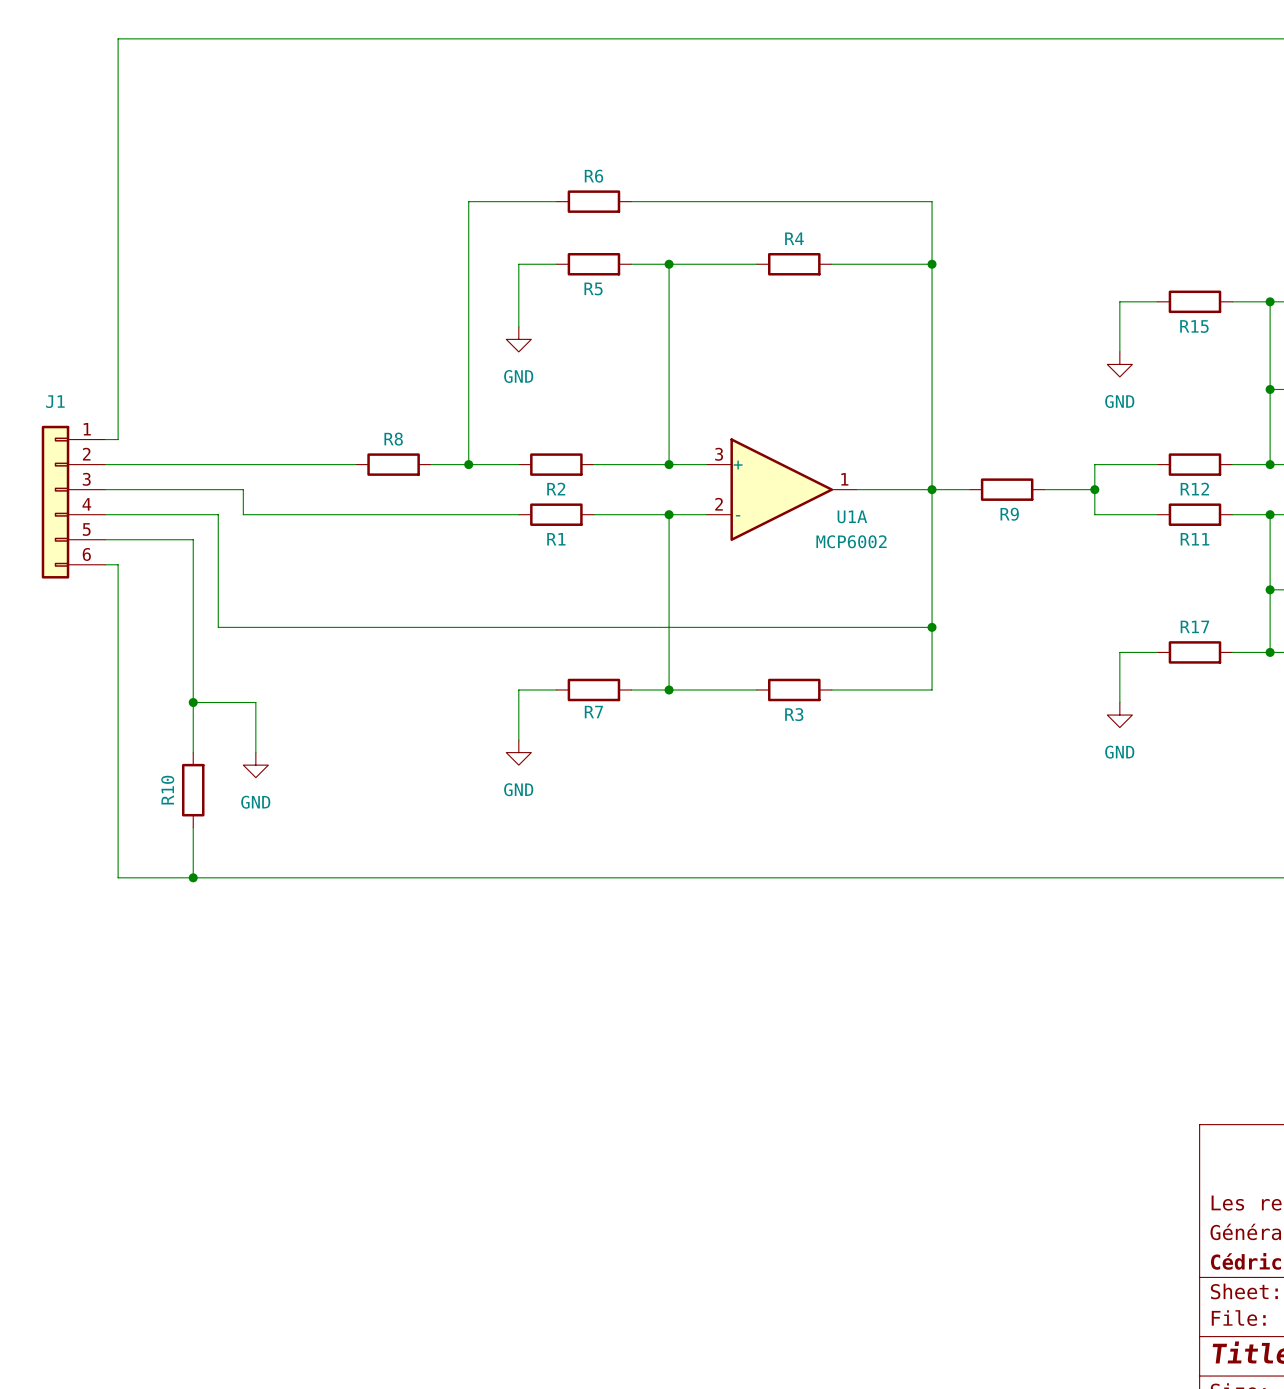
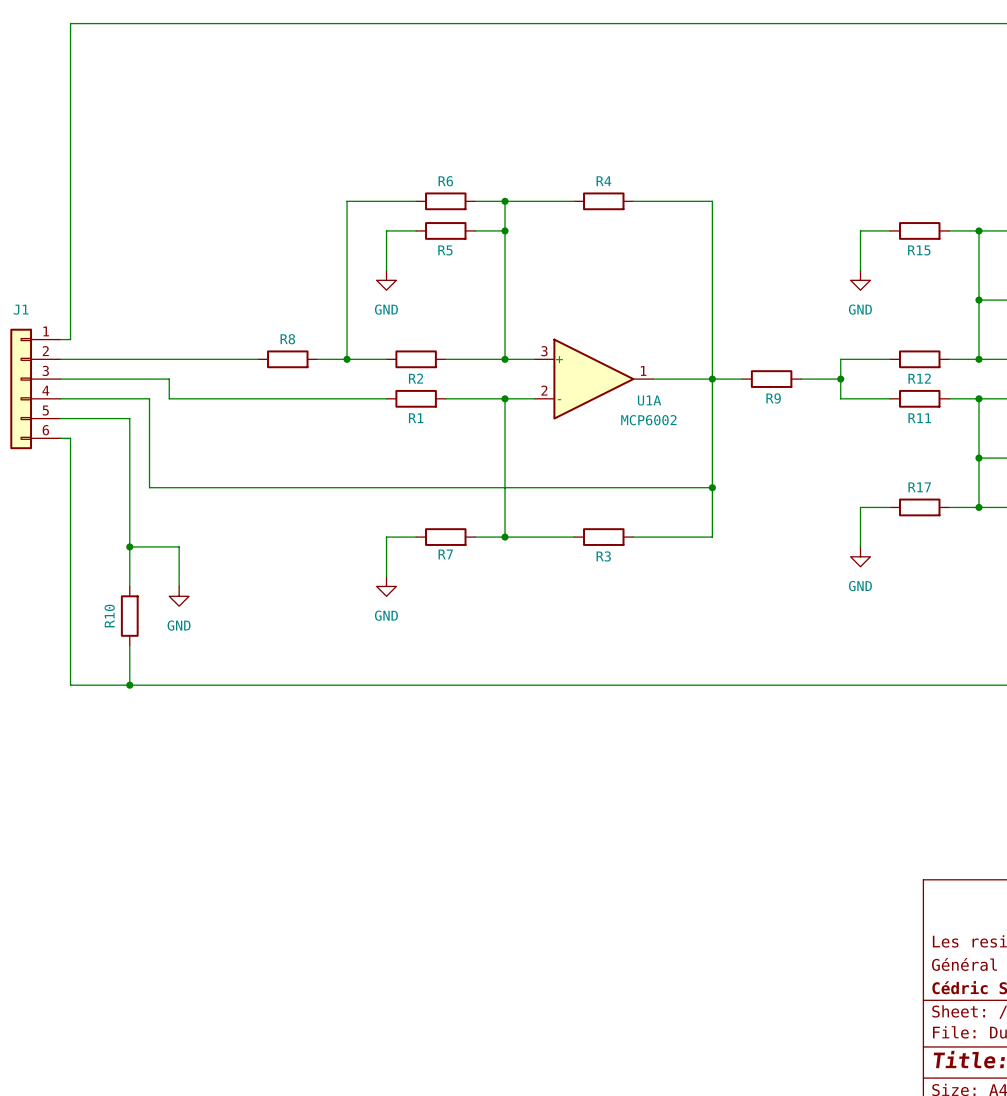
wire: (556, 201) (468, 201) (468, 264) -> (386, 201) (347, 201)
R6: (593, 201) -> none
wire: (631, 201) (932, 201) (932, 264) -> none
wire: (518, 264) (518, 301) -> (416, 230) (386, 230)
junction: (932, 264) -> none
R5 name: R5 (593, 288) -> R6 (445, 181)
R5: none -> (445, 230)
wire: none -> (475, 230) (505, 230)
junction: none -> (505, 230)
power symbol position: GND (518, 339) -> GND (386, 280)

